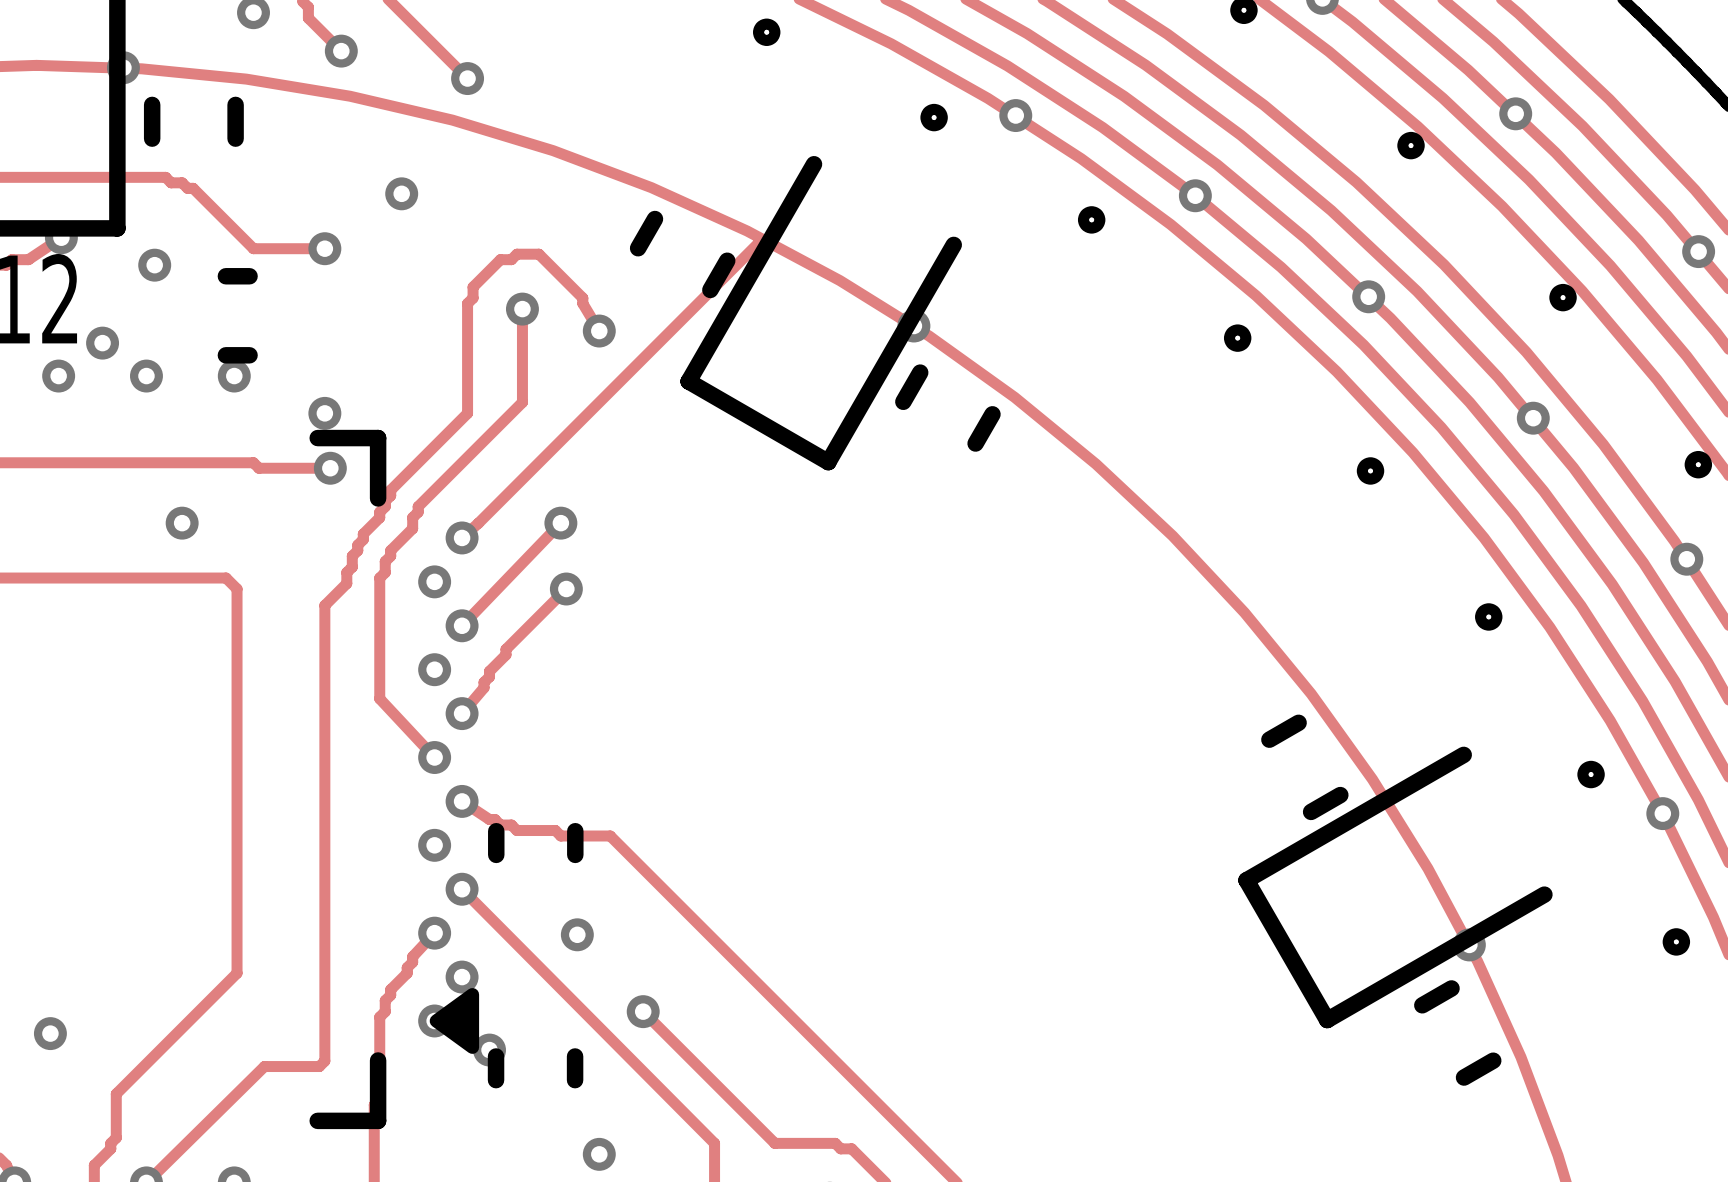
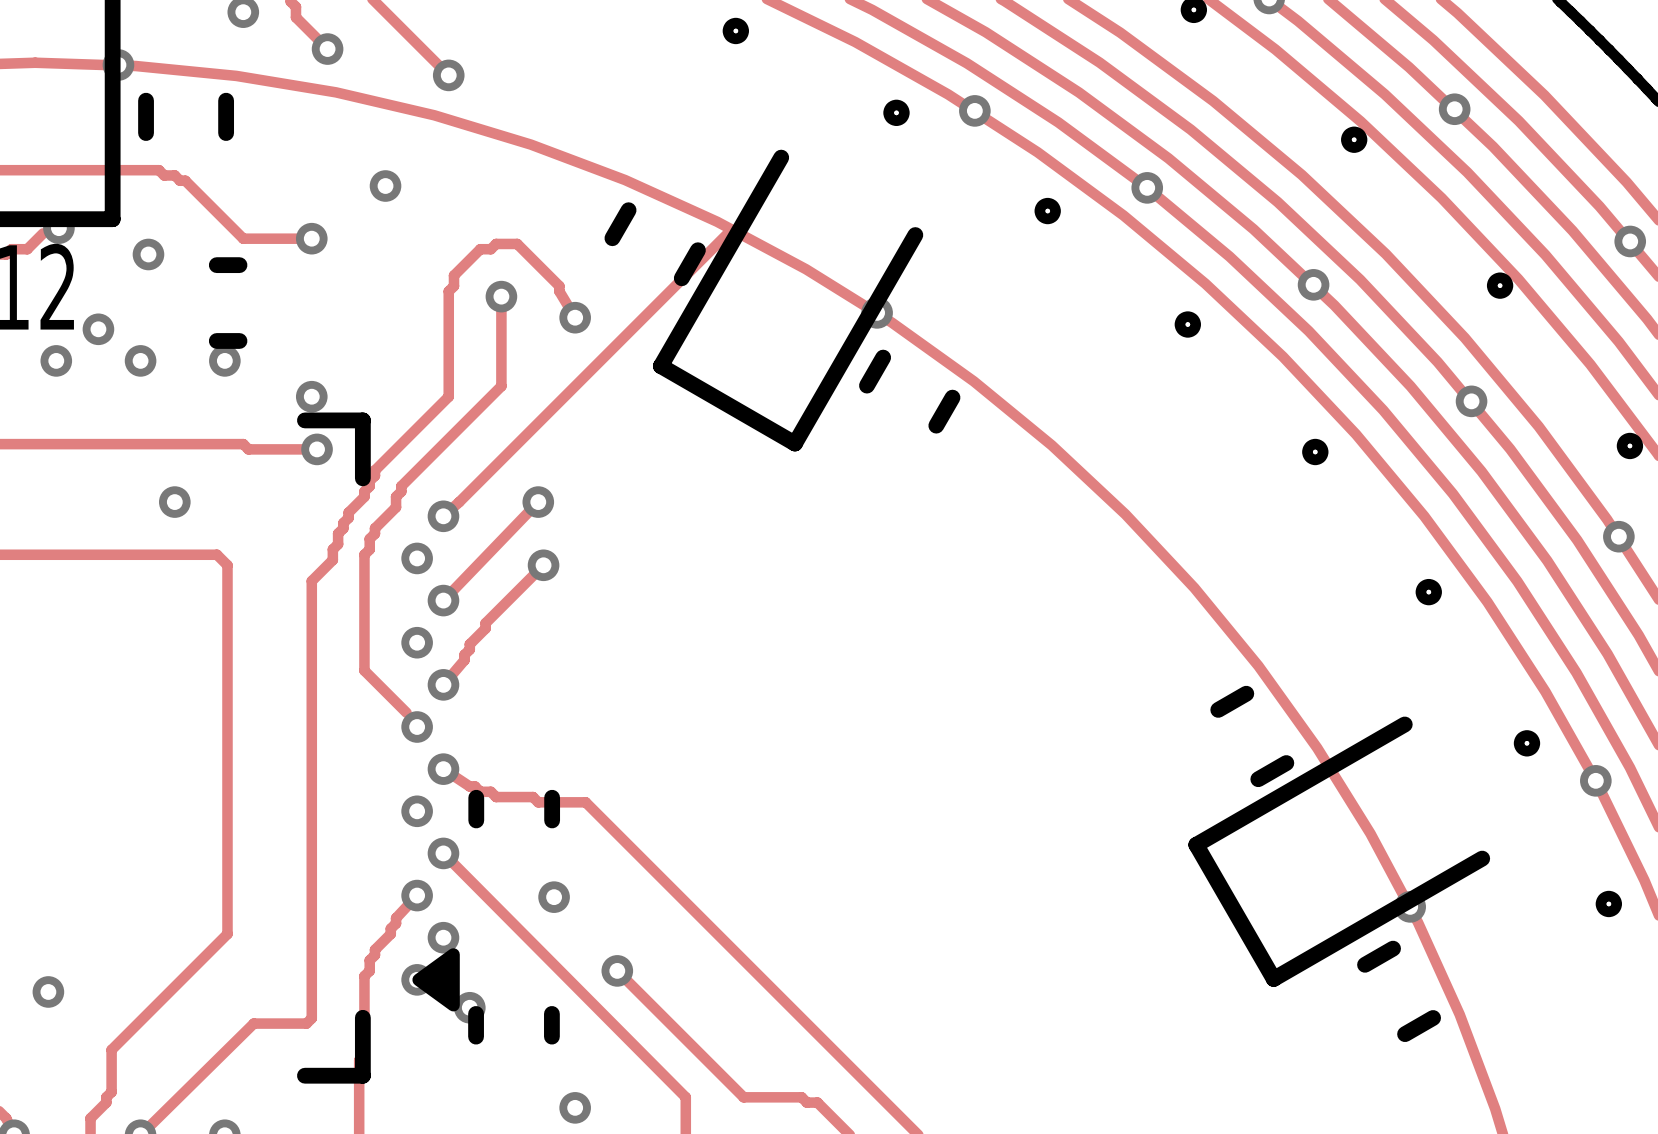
track: (61, 237) (28, 259) -> (43, 233) (27, 249)
track: (379, 698) (434, 757) -> (364, 670) (406, 712)

